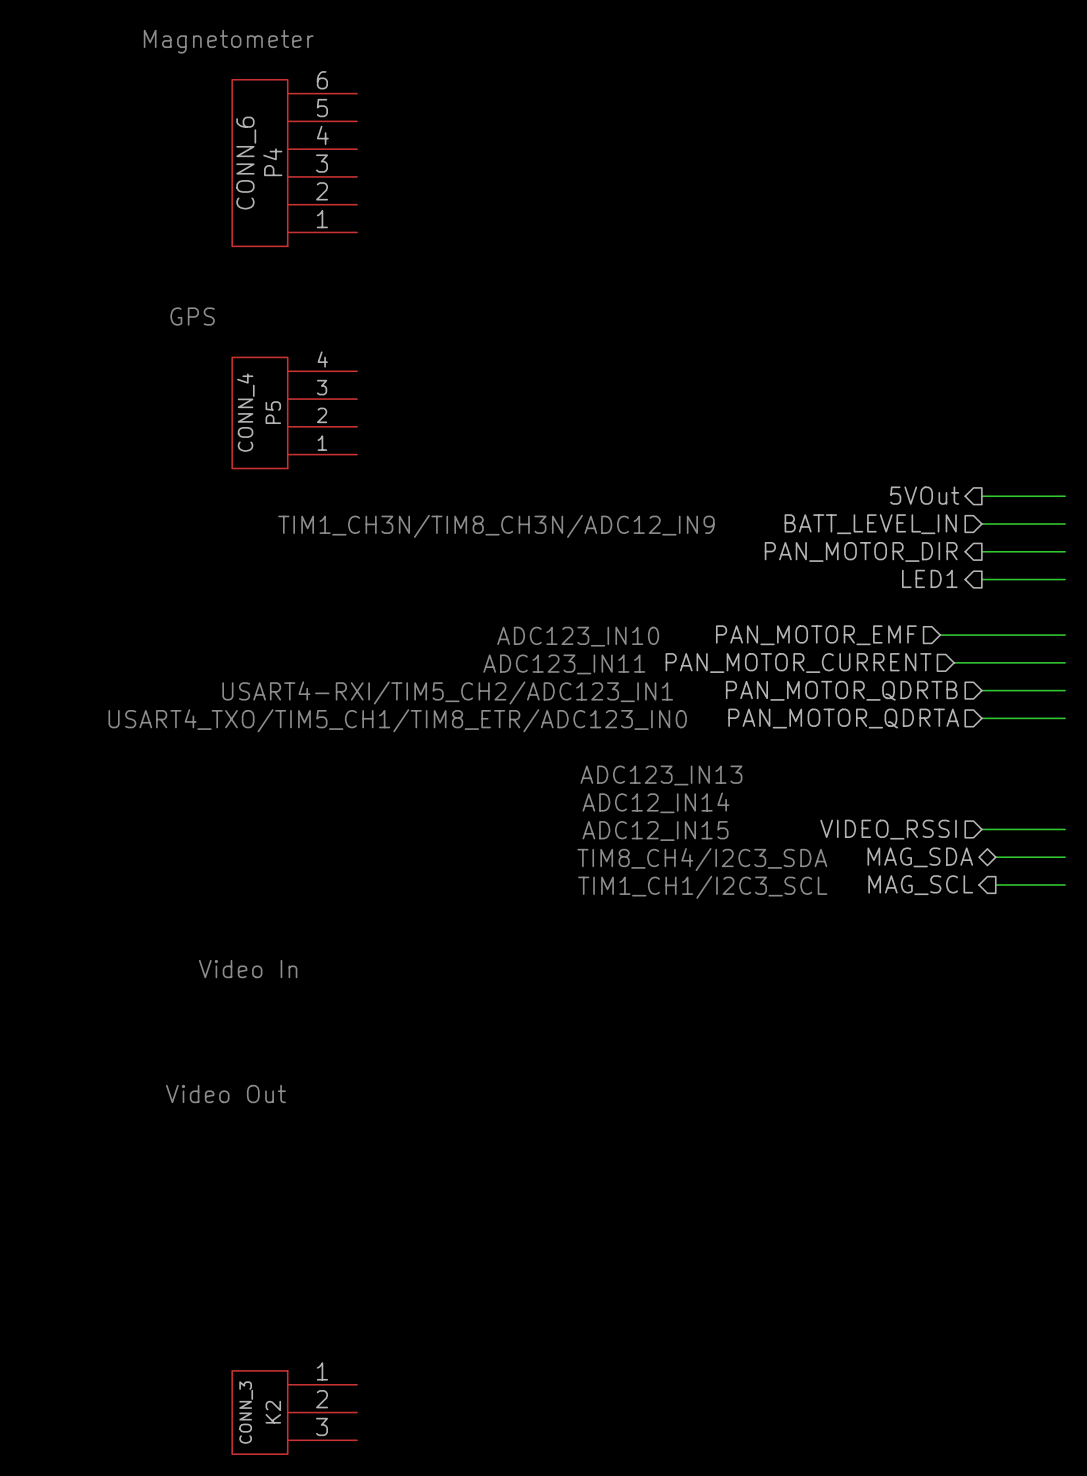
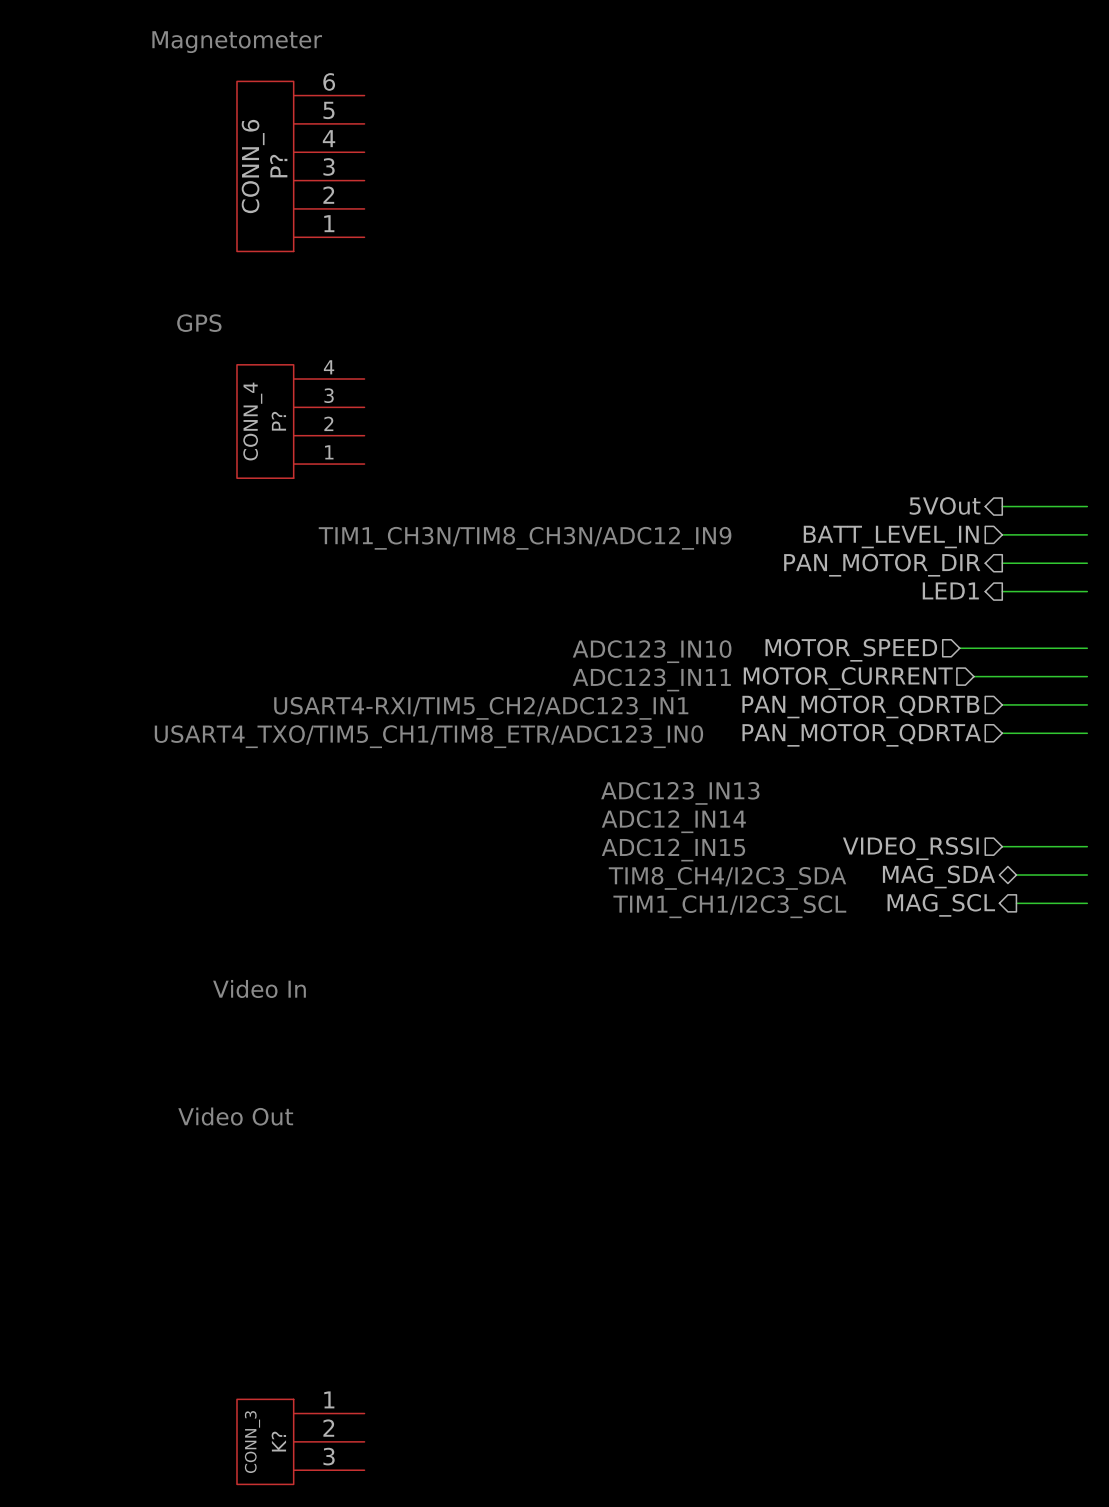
P4 name: P4 (272, 162) -> P? (278, 166)
P5 name: P5 (273, 412) -> P? (278, 421)
hierarchical label: PAN_MOTOR_EMF (816, 635) -> MOTOR_SPEED (851, 650)
text position: ADC123_IN10 (578, 636) -> ADC123_IN10 (652, 651)
hierarchical label: PAN_MOTOR_CURRENT (798, 663) -> MOTOR_CURRENT (848, 678)
text position: ADC123_IN11 (564, 664) -> ADC123_IN11 (651, 680)
K2 name: K2 (273, 1412) -> K? (278, 1441)

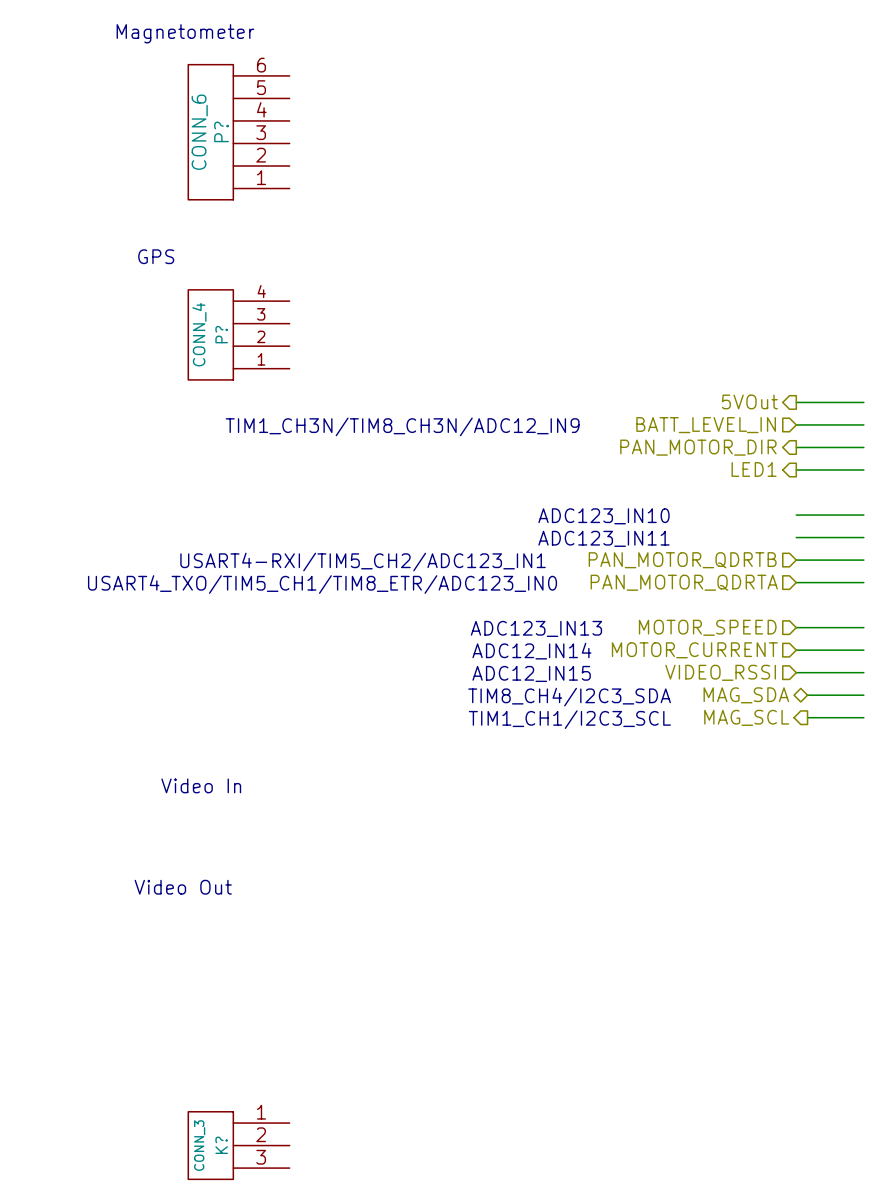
wire: (959, 648) (1002, 648) -> none
hierarchical label position: MOTOR_SPEED (851, 650) -> MOTOR_SPEED (707, 627)
text position: ADC123_IN10 (652, 651) -> ADC123_IN10 (603, 516)
wire: (973, 676) (1002, 676) -> none
hierarchical label position: MOTOR_CURRENT (848, 678) -> MOTOR_CURRENT (694, 650)
text position: ADC123_IN11 (651, 680) -> ADC123_IN11 (603, 538)
wire: none -> (796, 627) (863, 627)
wire: none -> (796, 650) (863, 650)

